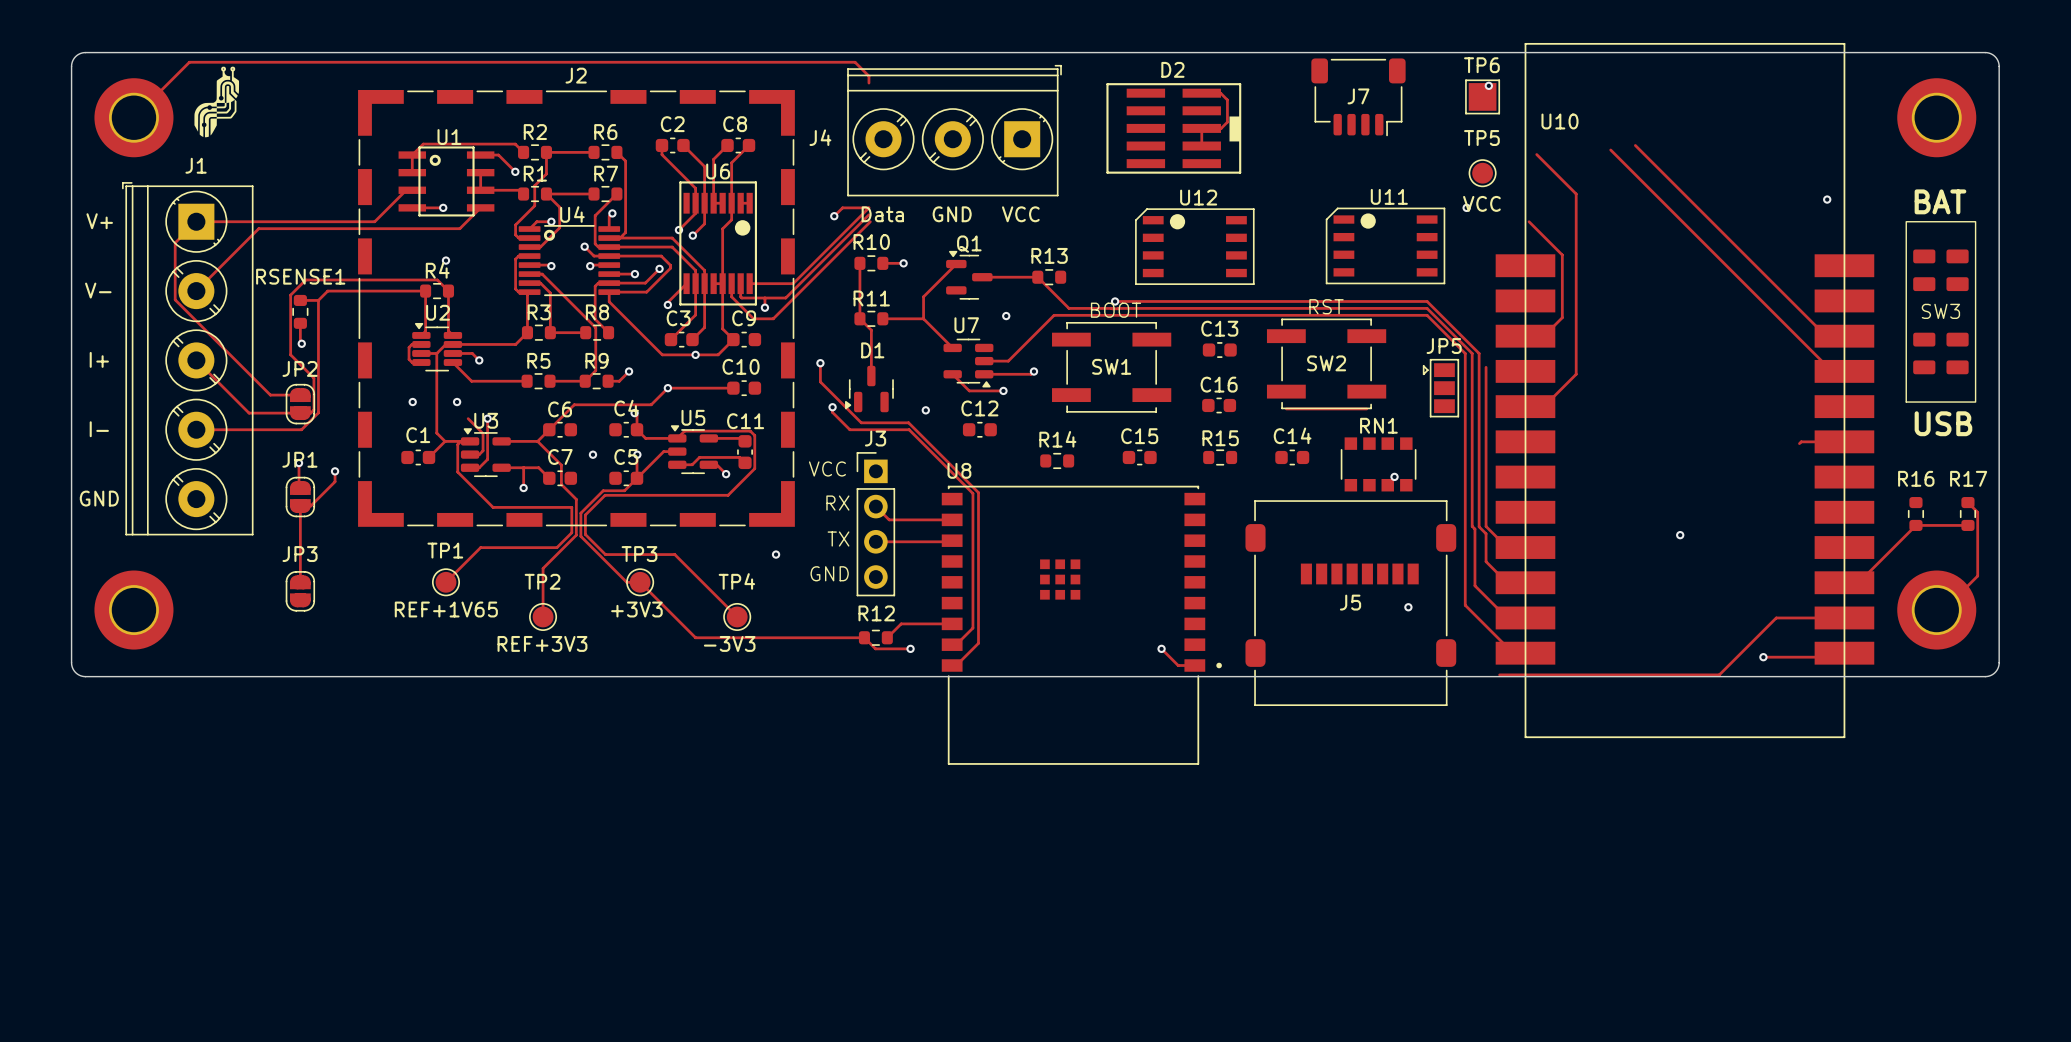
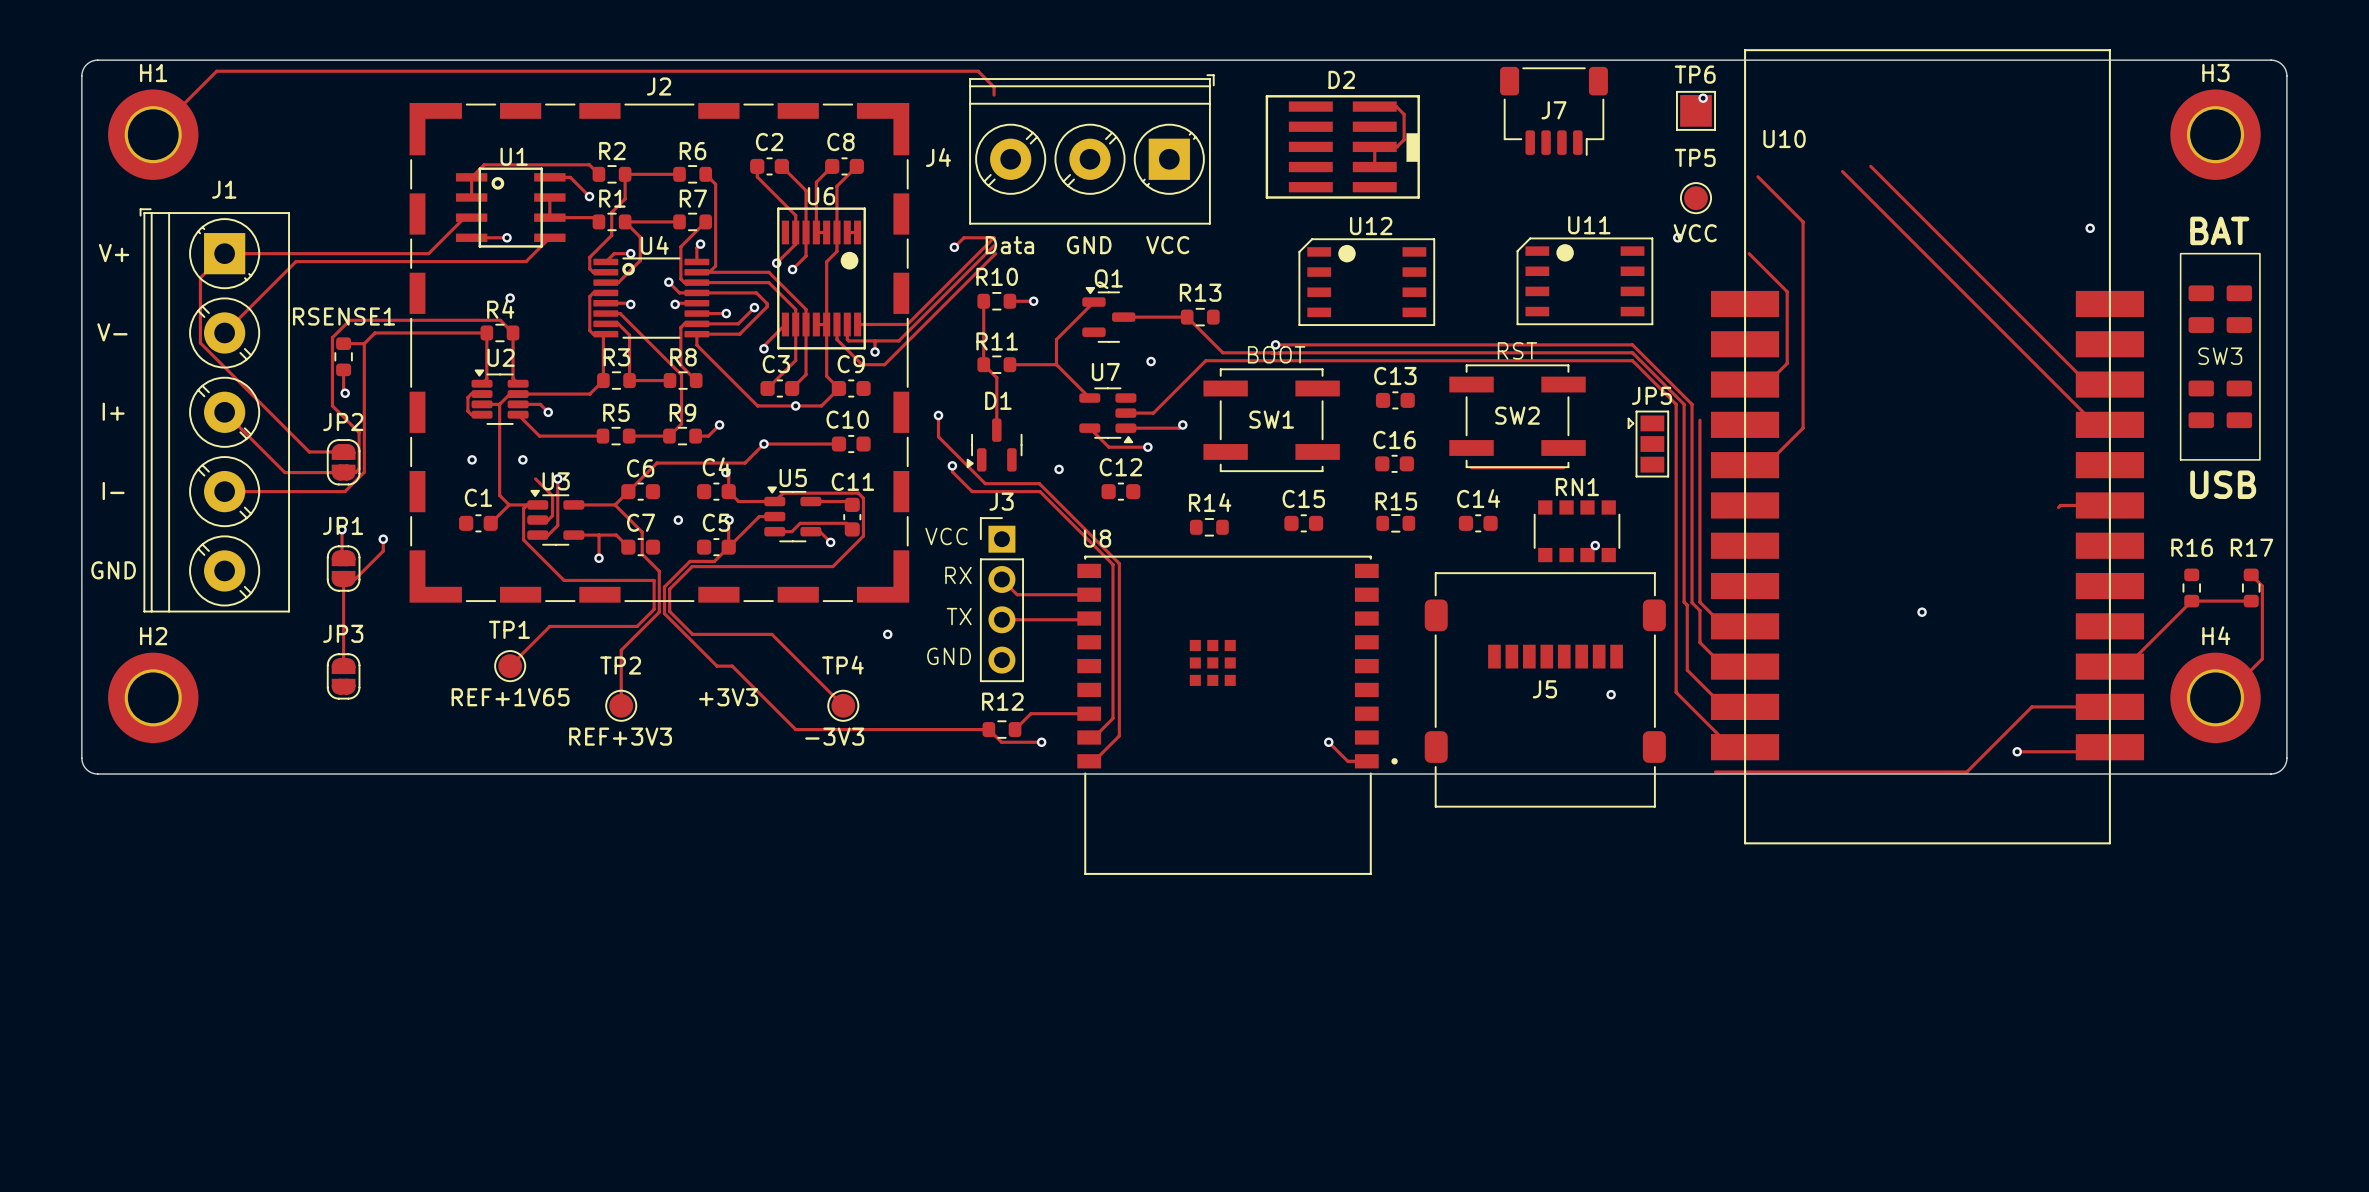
H1 name: none -> H1 (153, 73)
H3 name: none -> H3 (2215, 73)
drawing: [194, 66, 240, 138] -> none
H4 name: none -> H4 (2216, 635)
H2 name: none -> H2 (153, 636)
TP3: (640, 582) -> none

